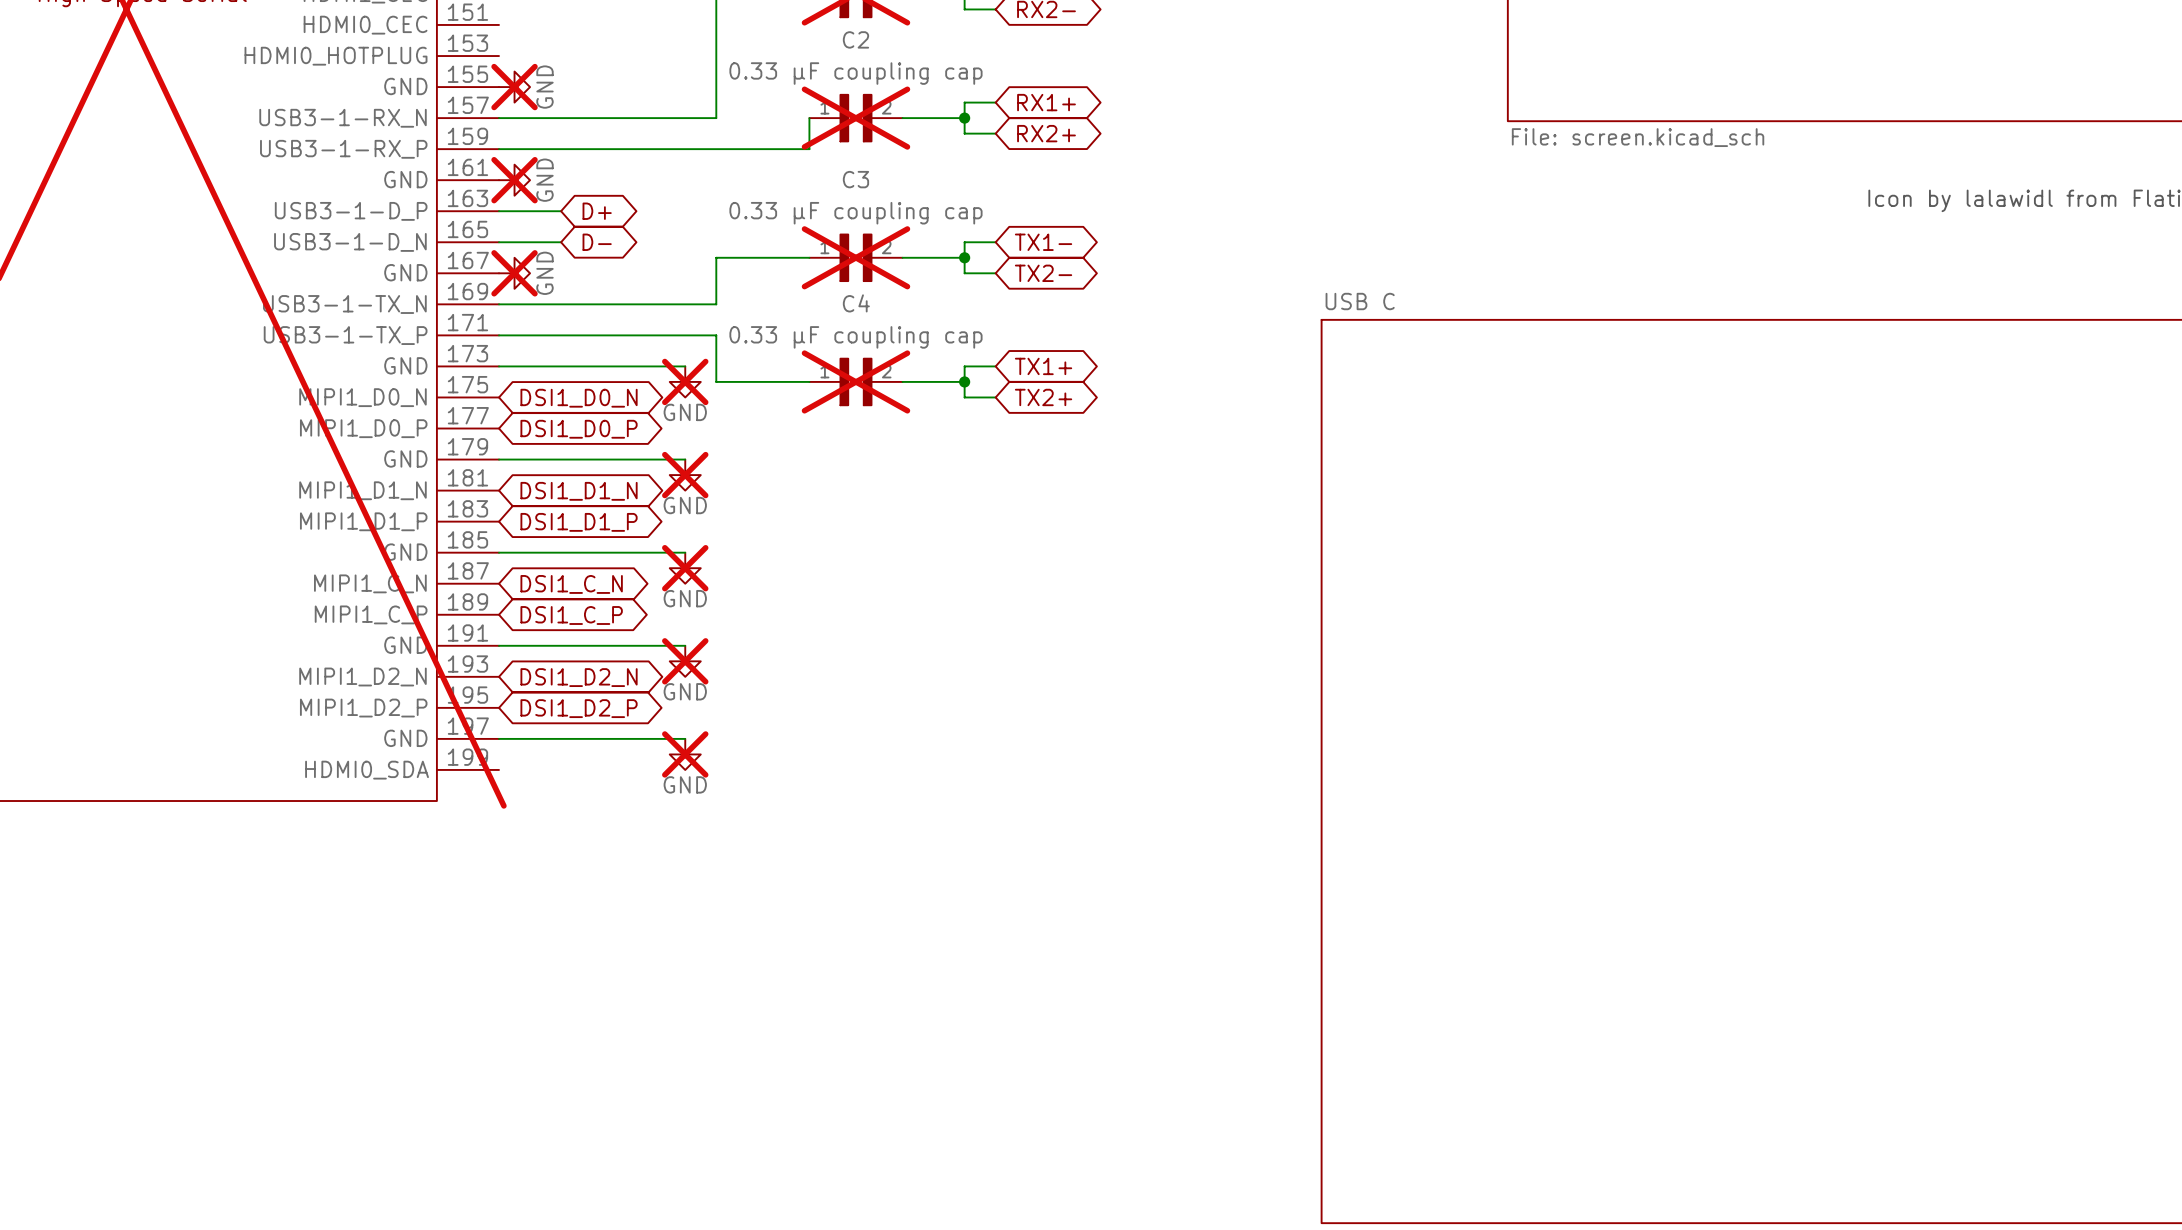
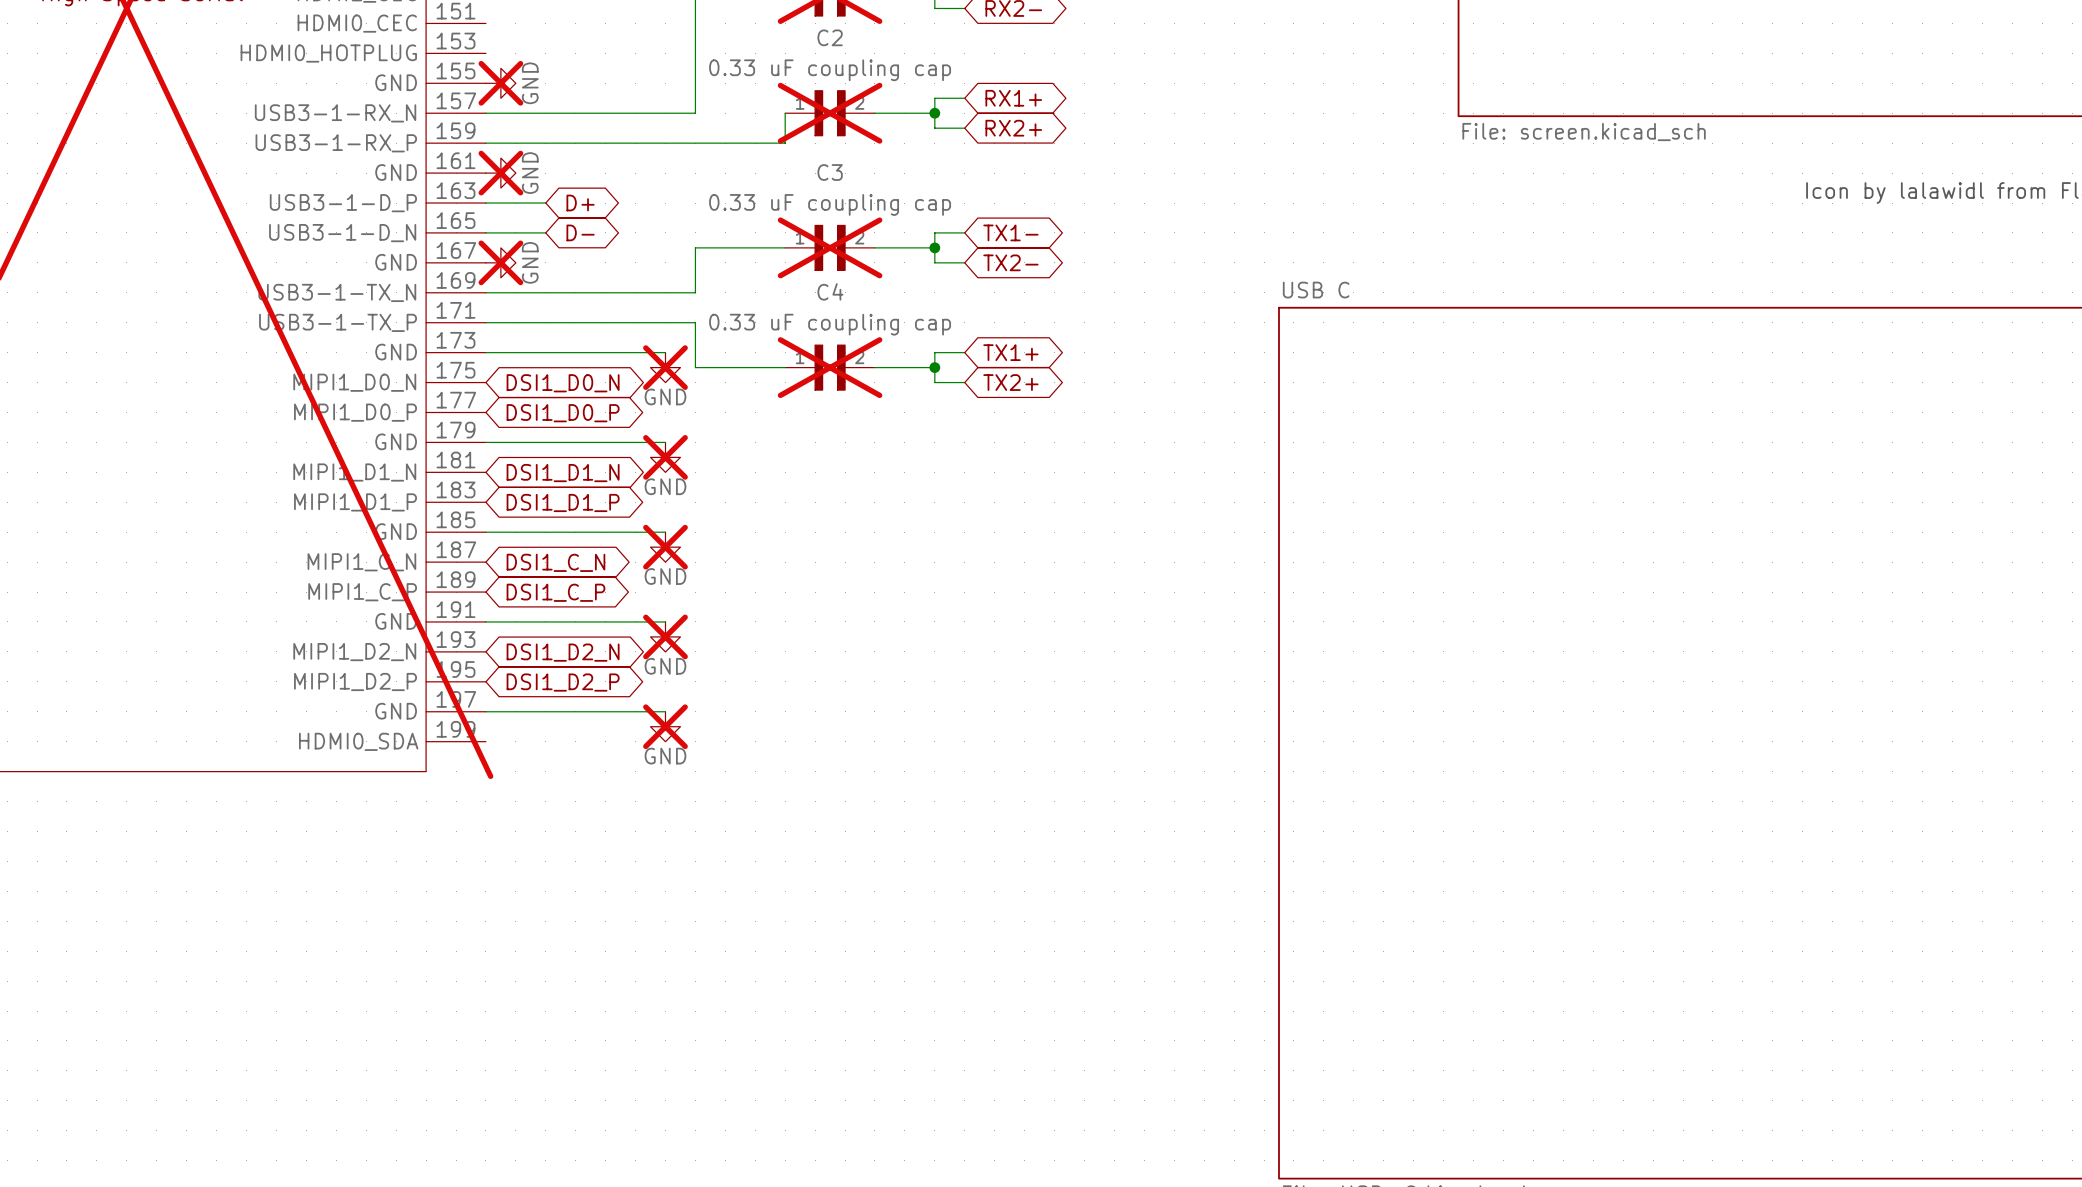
C2 value: 0.33 µF coupling cap (855, 73) -> 0.33 uF coupling cap (830, 70)
C3 value: 0.33 µF coupling cap (855, 213) -> 0.33 uF coupling cap (830, 204)
C4 value: 0.33 µF coupling cap (855, 337) -> 0.33 uF coupling cap (830, 324)

